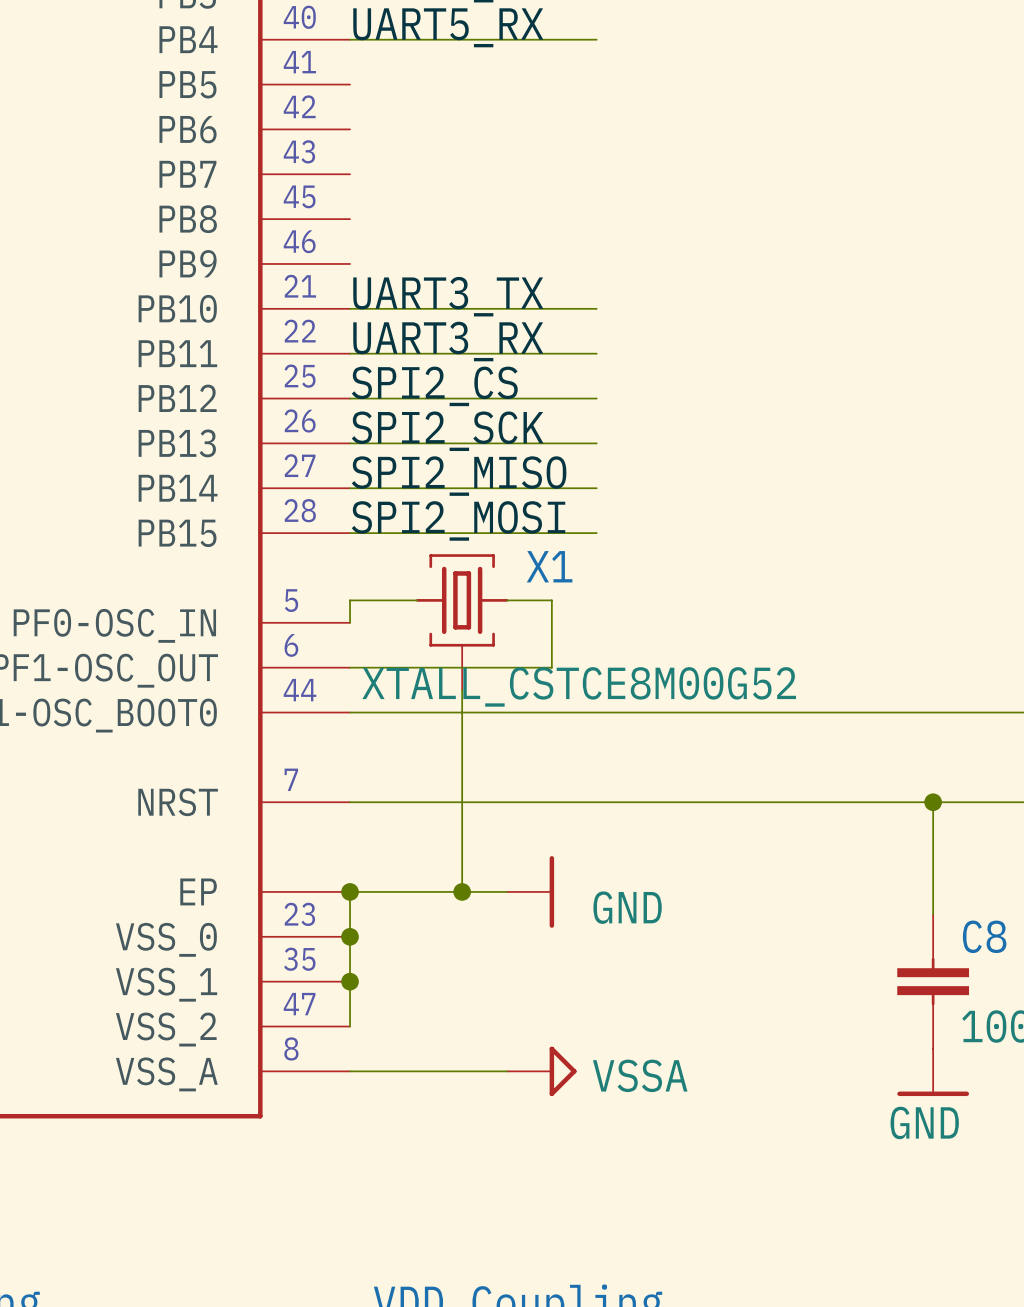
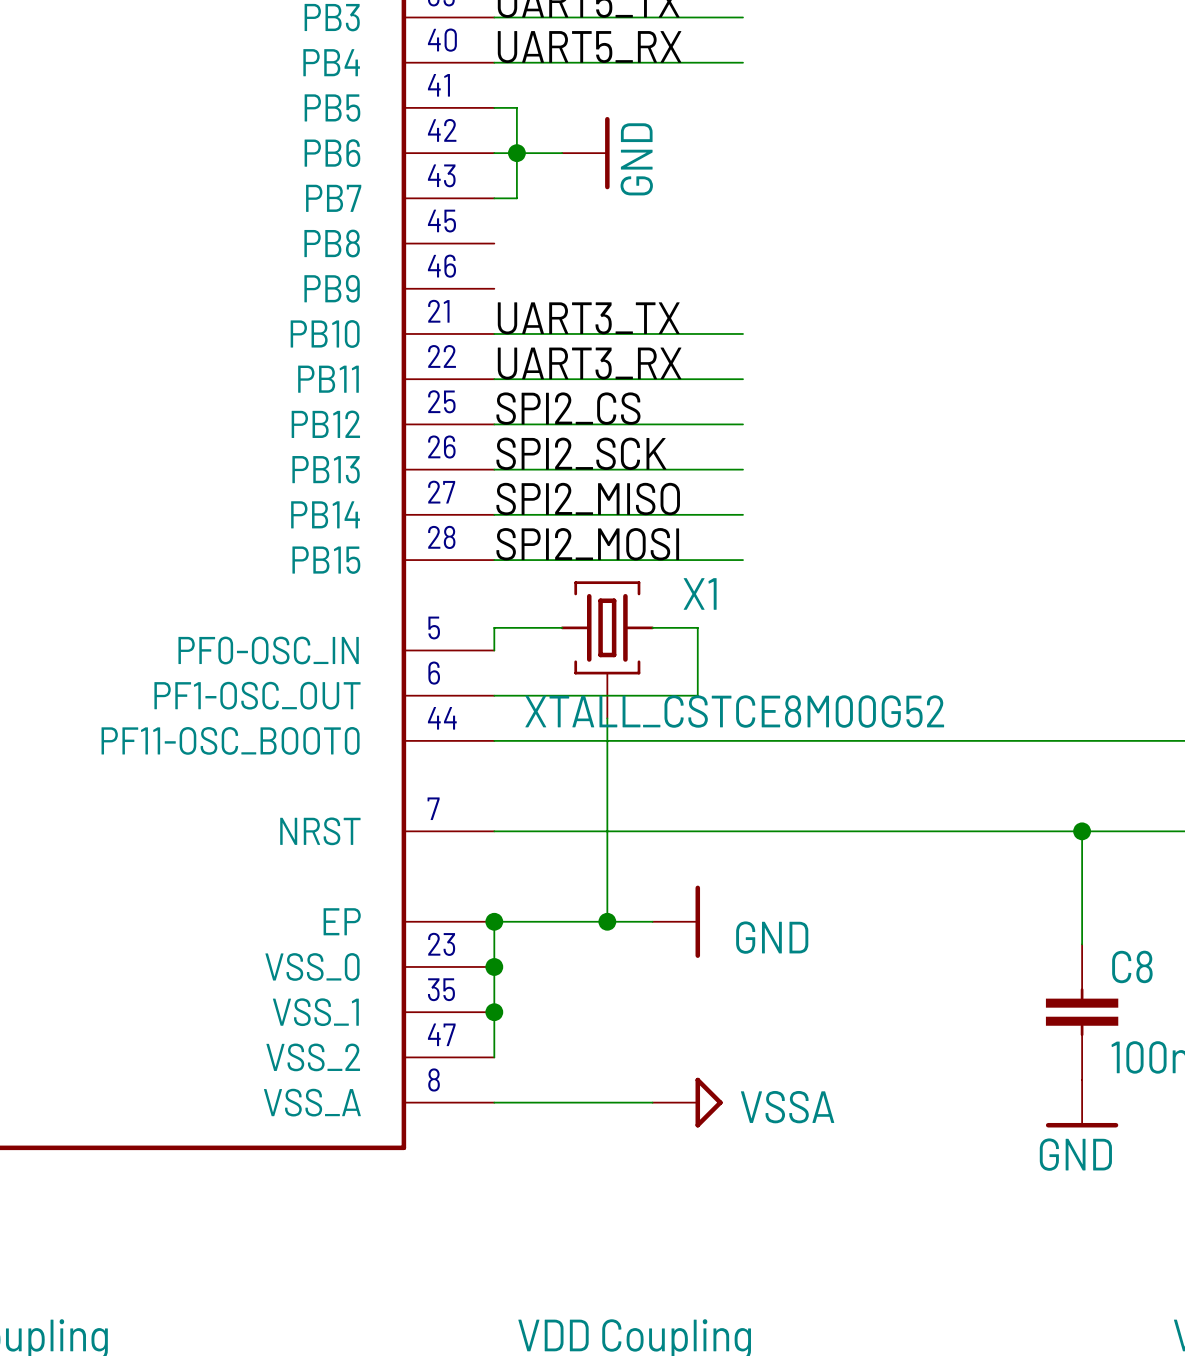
wire: none -> (494, 107) (516, 107) (516, 198) (494, 198)
wire: none -> (494, 153) (562, 153)
junction: none -> (516, 153)
power symbol: none -> GND (585, 153)

